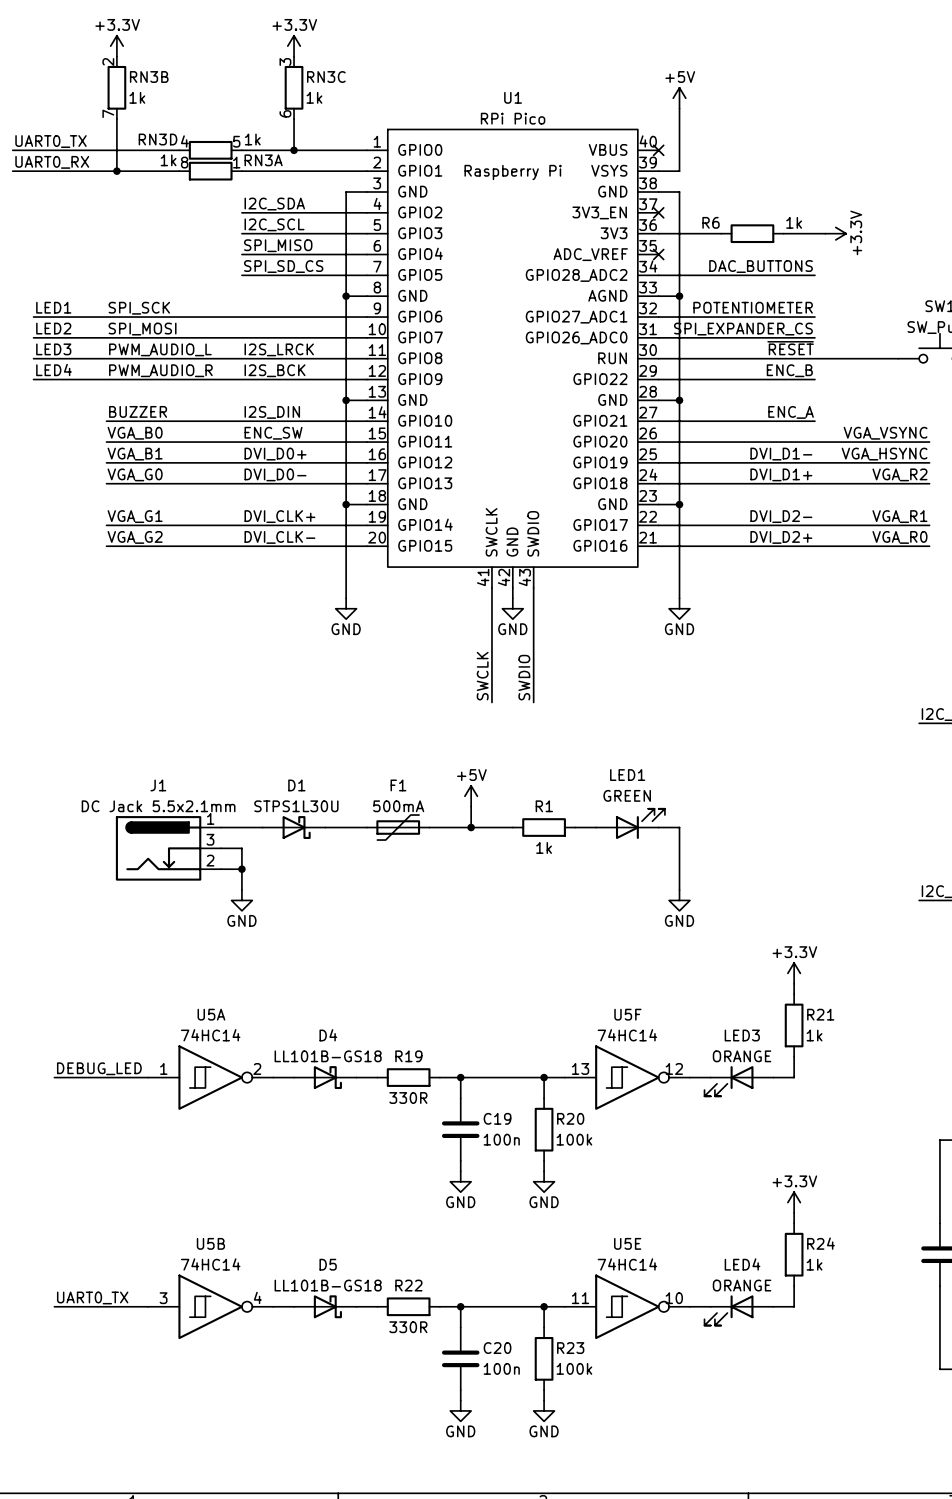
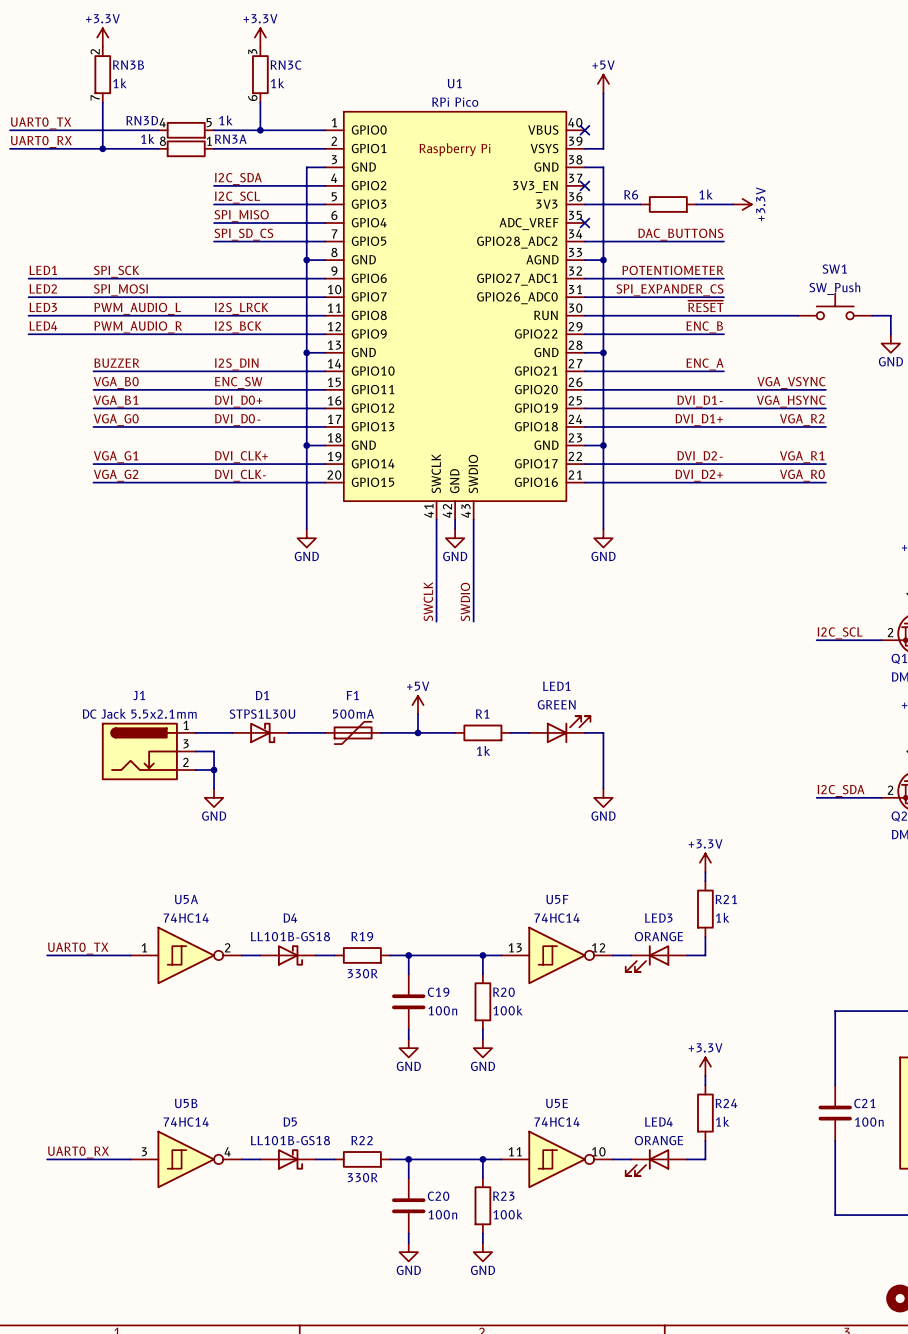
label: DEBUG_LED (99, 1068) -> UART0_TX (78, 948)
label: UART0_TX (92, 1297) -> UART0_RX (78, 1152)

